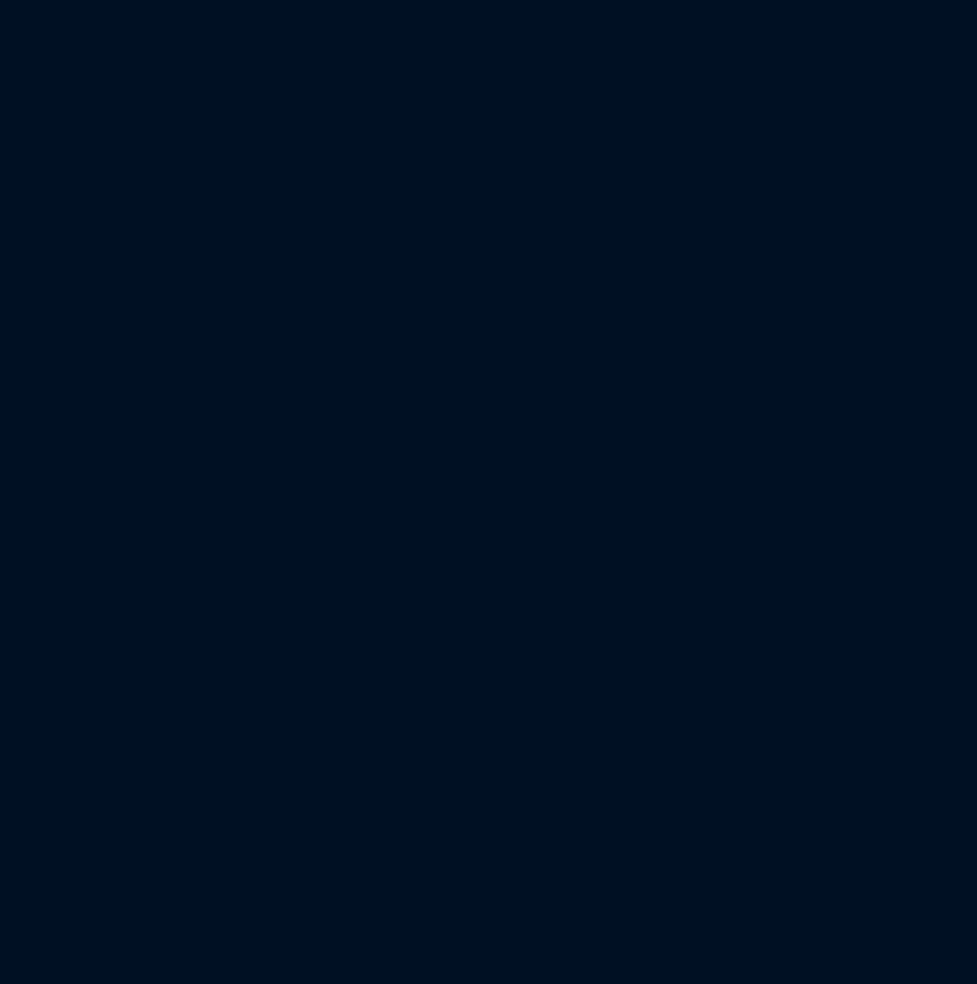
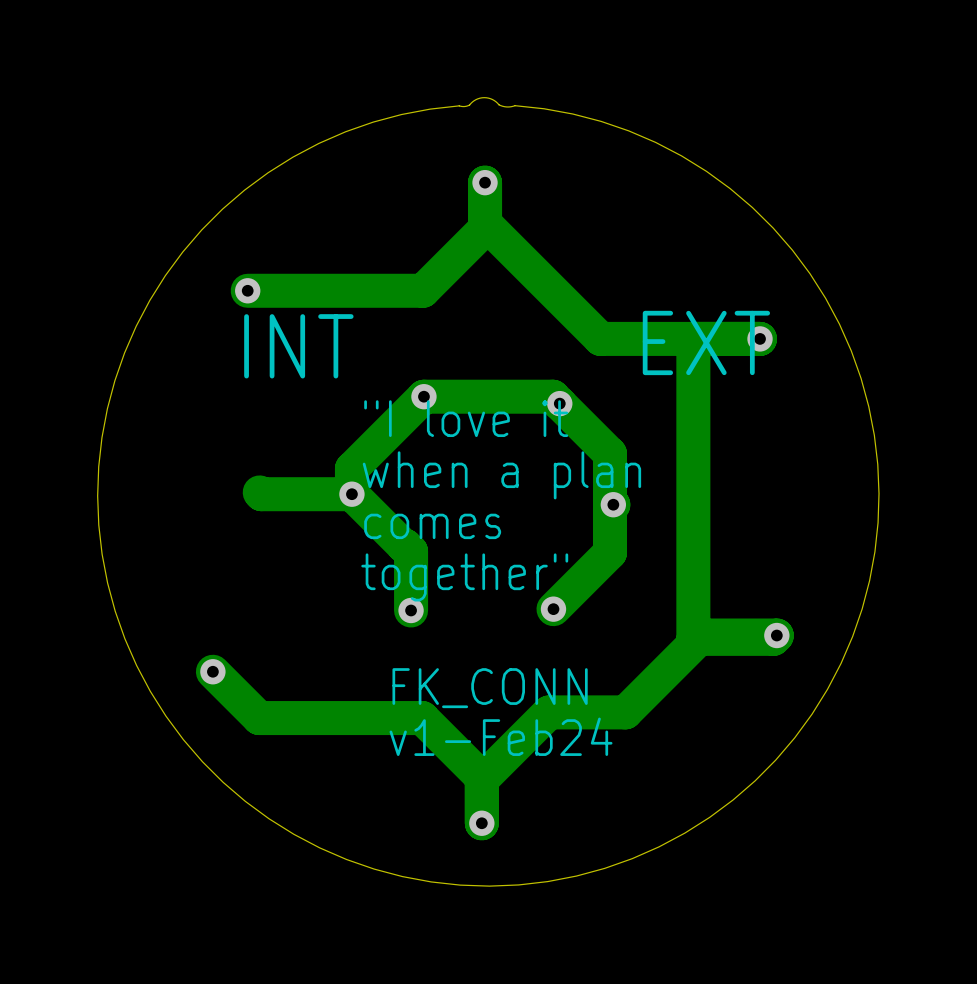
board edge: none -> (498, 104) (544, 108) (572, 114) (601, 121) (655, 142) (681, 155) (730, 188) (773, 228) (809, 273) (839, 324) (851, 350) (868, 406) (874, 435) (879, 493) (878, 522) (869, 580) (862, 608) (841, 663) (812, 714) (794, 737) (755, 780) (733, 799) (684, 833) (632, 858) (576, 876) (518, 884) (489, 886) (460, 885) (402, 876) (346, 859) (293, 834) (245, 801) (223, 782) (183, 739) (150, 691) (136, 665) (115, 611) (107, 582) (102, 554) (97, 495) (101, 437) (107, 408) (114, 380) (136, 326) (149, 300) (182, 252) (222, 209) (244, 190) (292, 157) (345, 131) (401, 114) (430, 109) (467, 106) (482, 97) (492, 99) (498, 104)
track: none -> (485, 182) (485, 228) (422, 290) (247, 290)
via: none -> (485, 182)
track: none -> (485, 223) (600, 338) (760, 338)
via: none -> (247, 290)
track: none -> (693, 338) (693, 638) (773, 638) (776, 635) (702, 635) (625, 712) (549, 712) (481, 779)
via: none -> (760, 338)
text: none -> EXT (706, 342)
text: none -> INT (298, 346)
via: none -> (423, 396)
via: none -> (559, 403)
text: none -> "I love it (466, 418)
text: none -> when a plan (501, 475)
track: none -> (259, 492) (261, 494) (351, 494)
track: none -> (351, 494) (351, 468) (423, 396) (552, 396) (609, 453) (609, 501) (613, 504) (609, 508) (609, 552) (553, 609)
track: none -> (351, 494) (411, 551) (411, 610)
via: none -> (351, 494)
via: none -> (613, 504)
text: none -> comes (432, 526)
text: none -> together" (464, 577)
via: none -> (553, 609)
via: none -> (411, 610)
via: none -> (776, 635)
track: none -> (212, 671) (259, 718) (422, 718) (481, 777) (481, 823)
via: none -> (212, 671)
text: none -> FK_CONN (490, 688)
text: none -> v1-Feb24 (501, 736)
via: none -> (481, 823)

